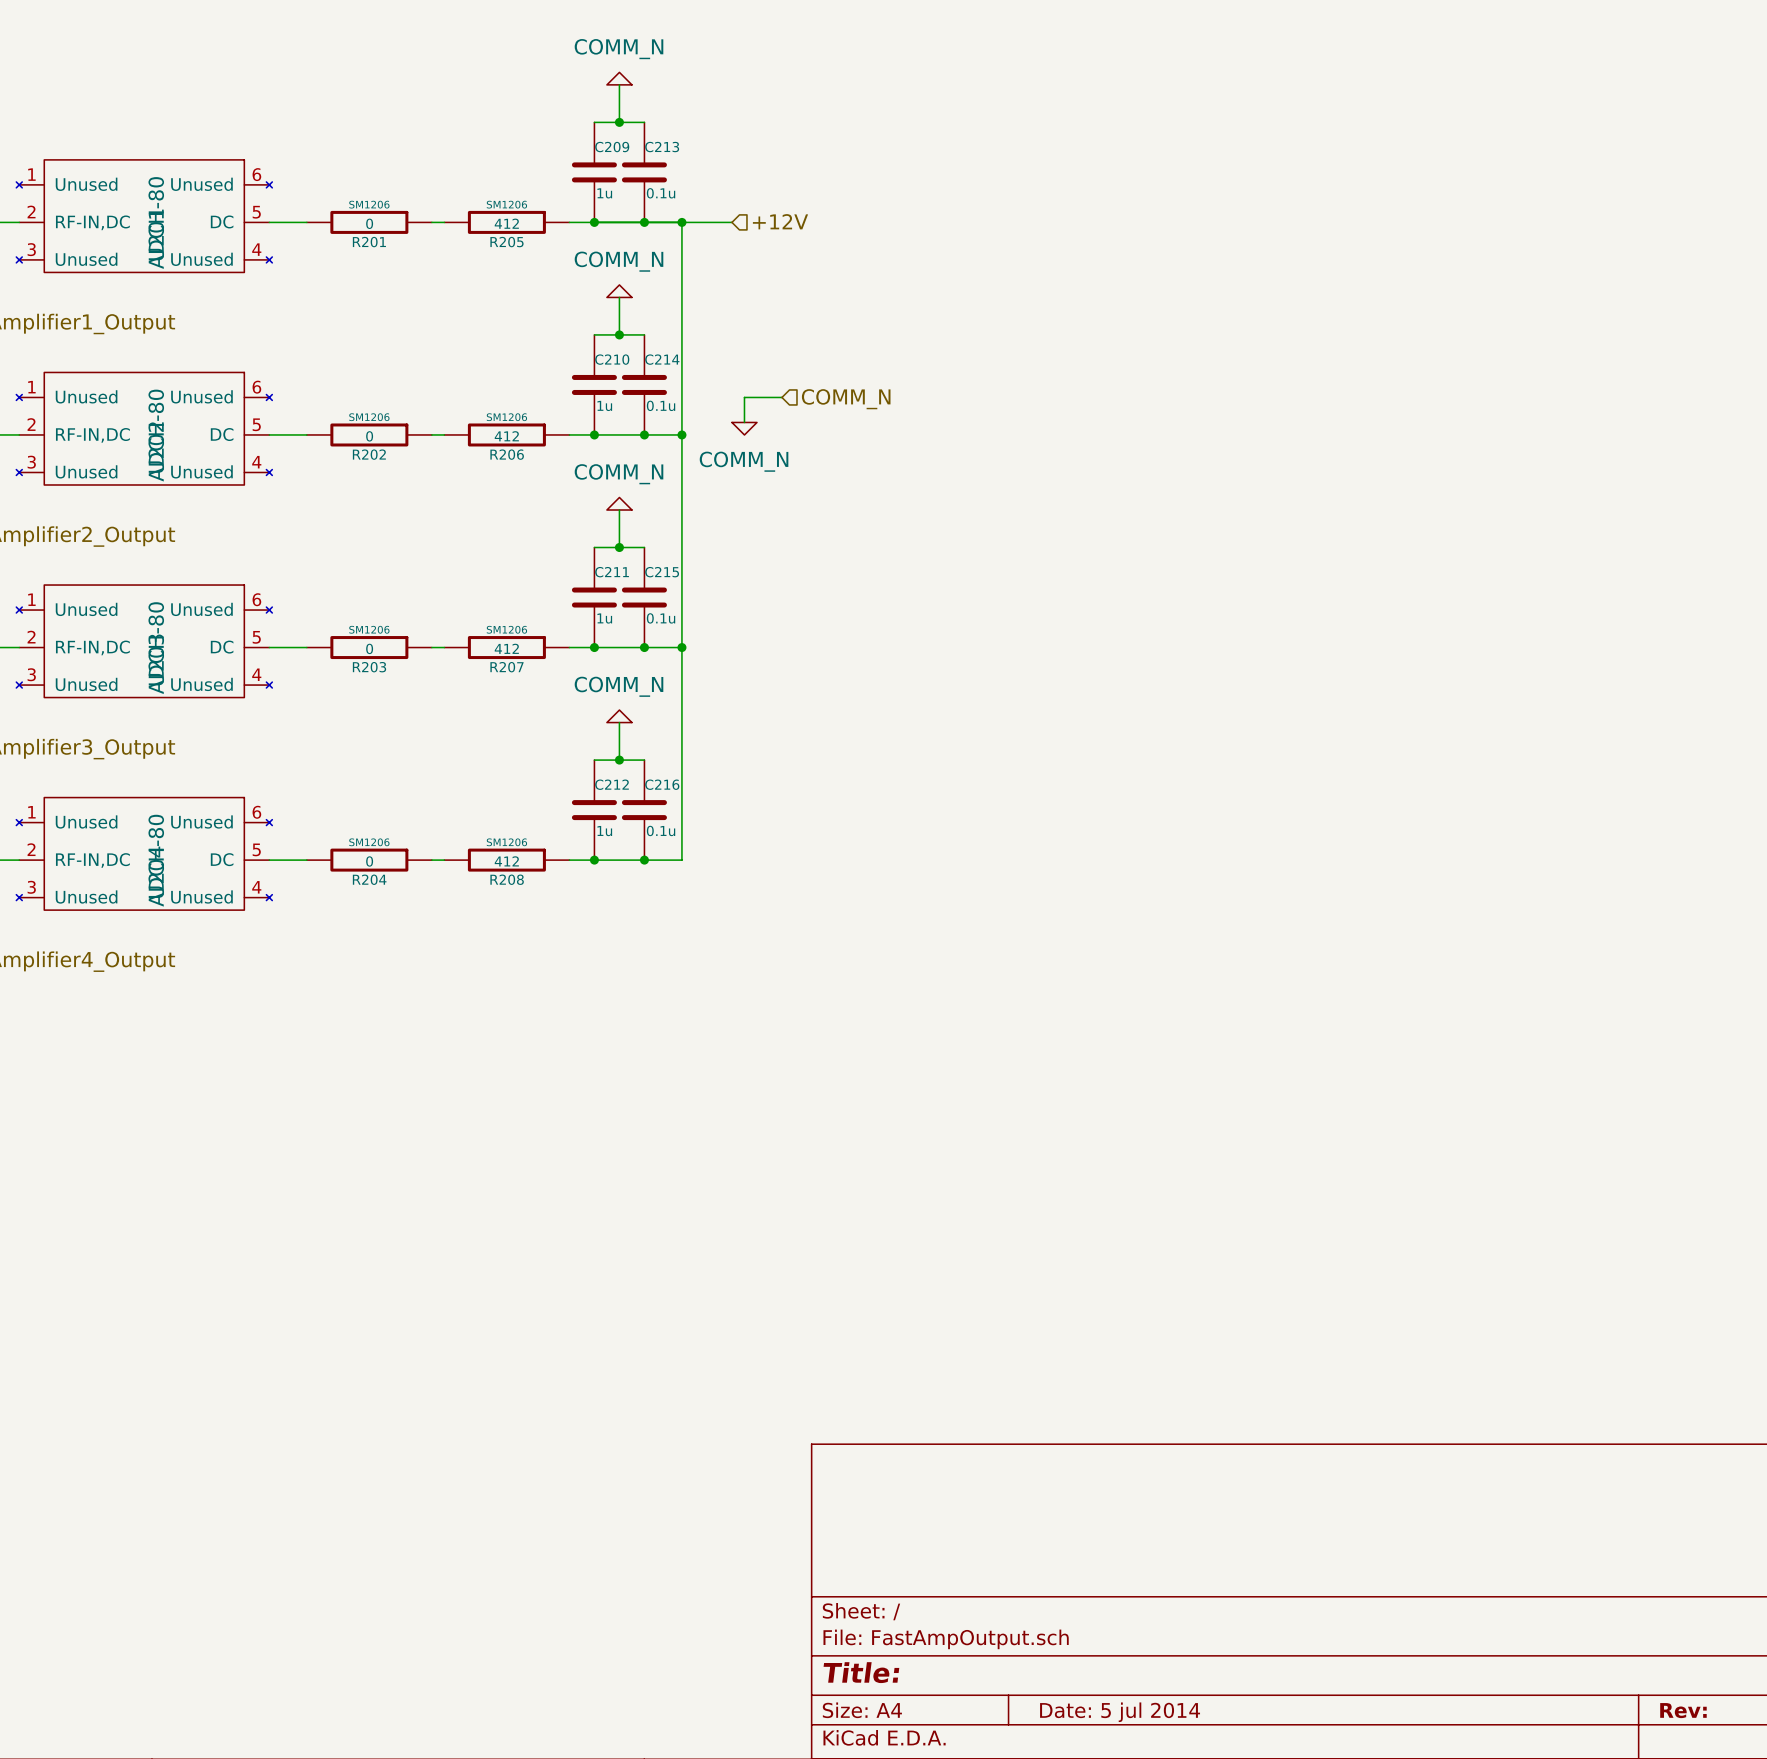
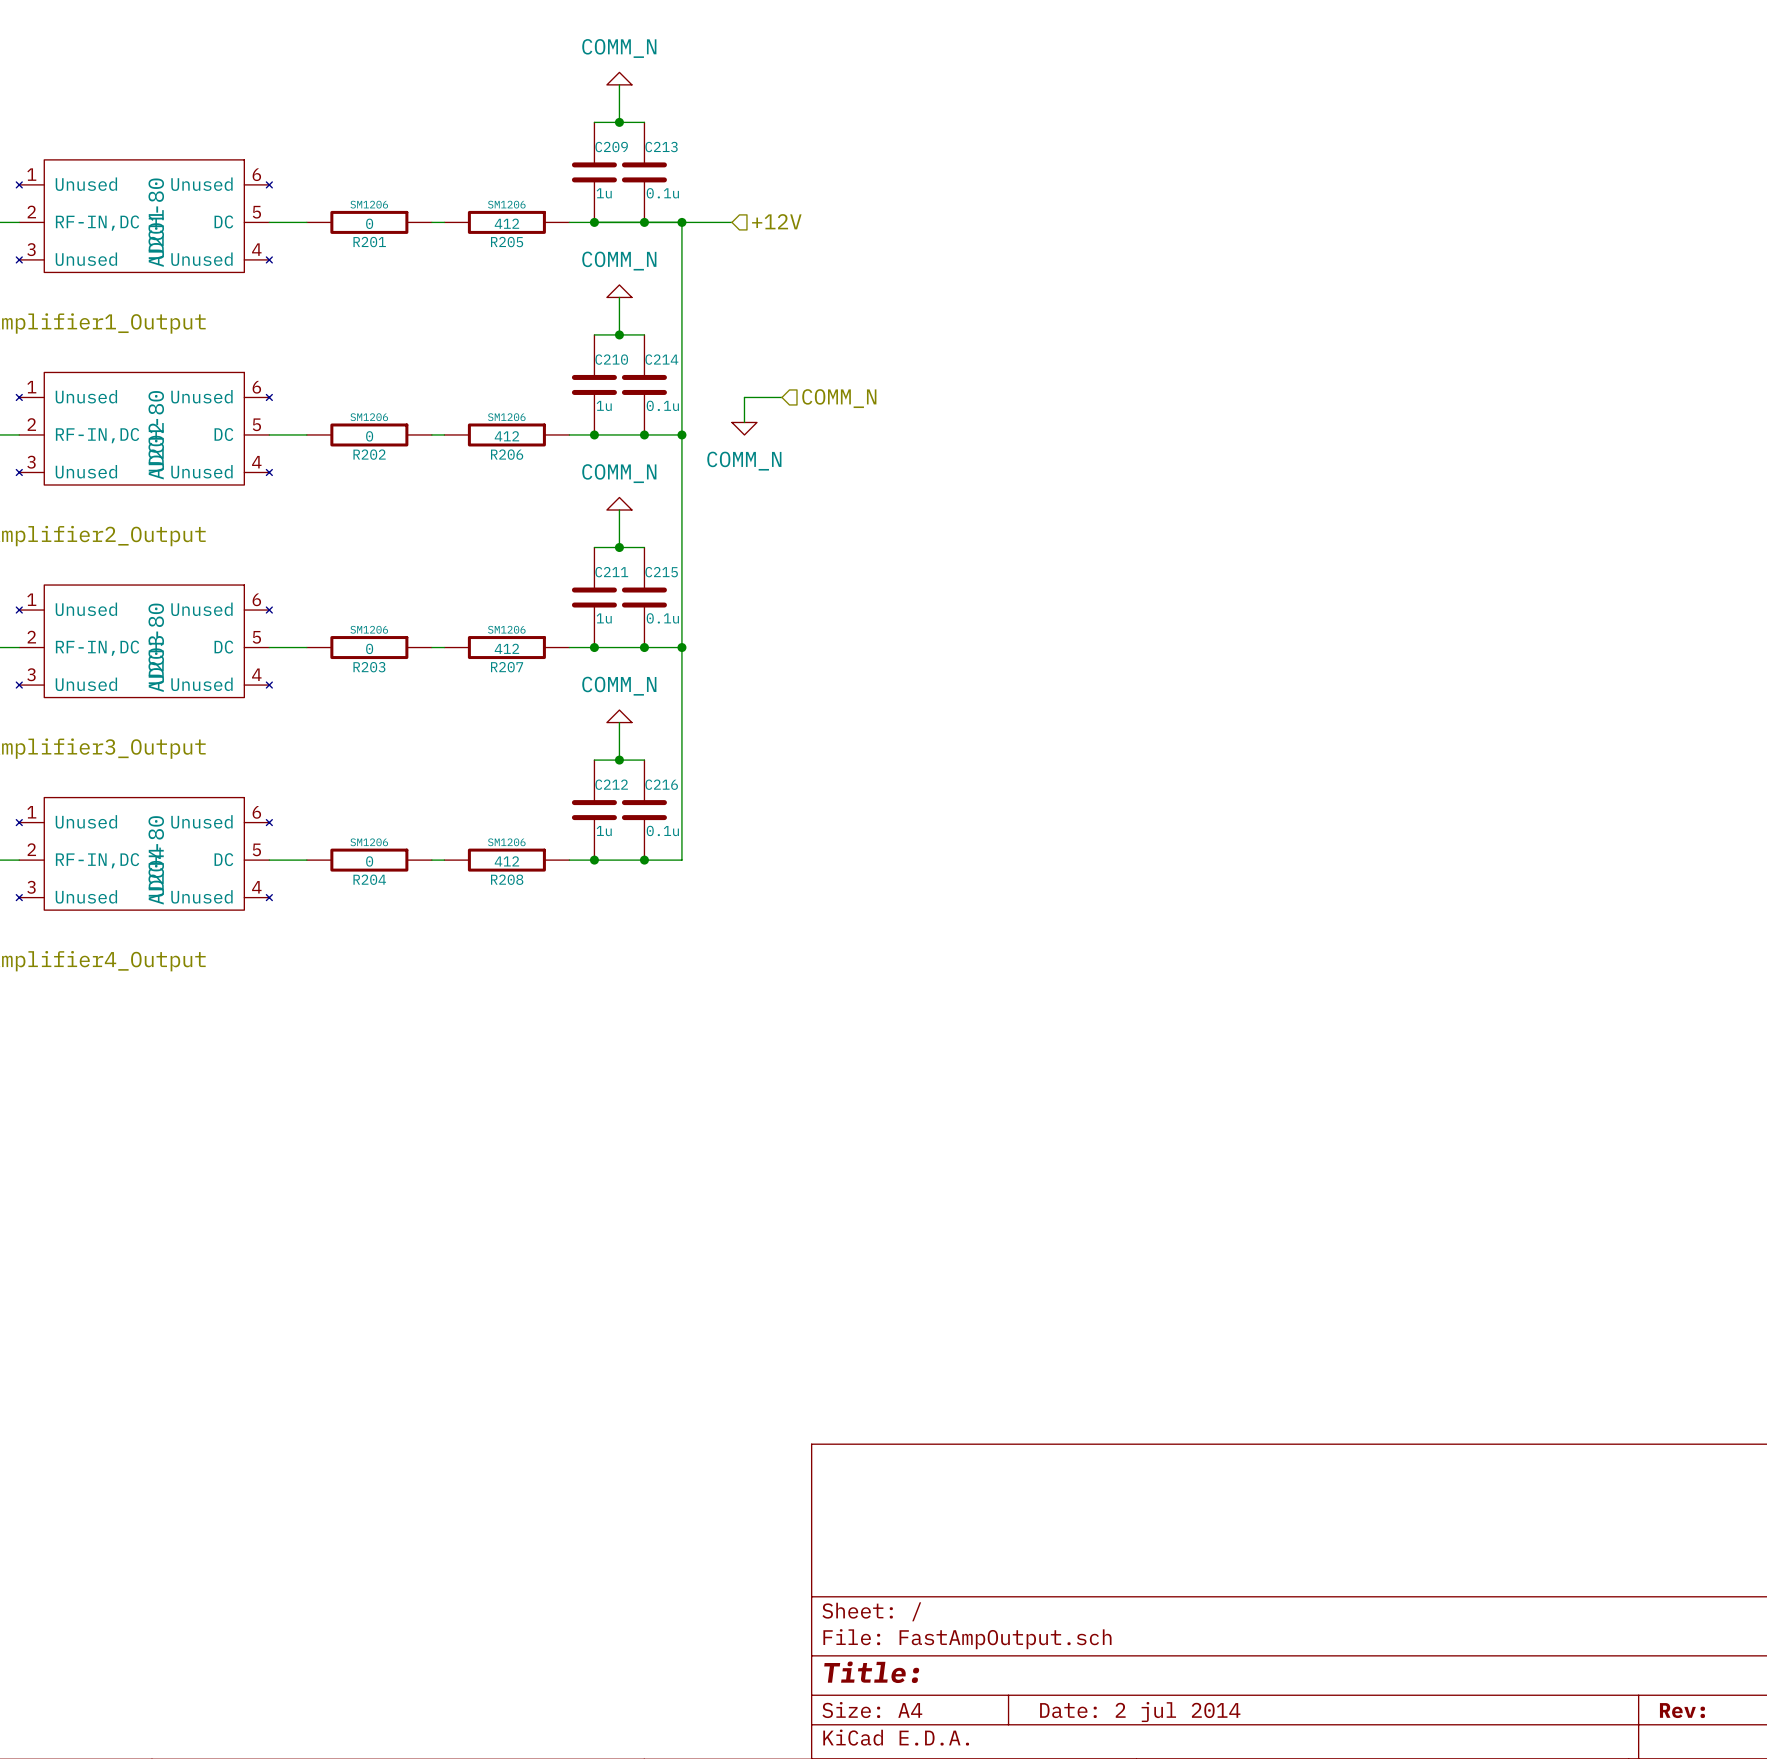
title block: Date: 5 jul 2014 (1120, 1712) -> Date: 2 jul 2014 (1140, 1712)

